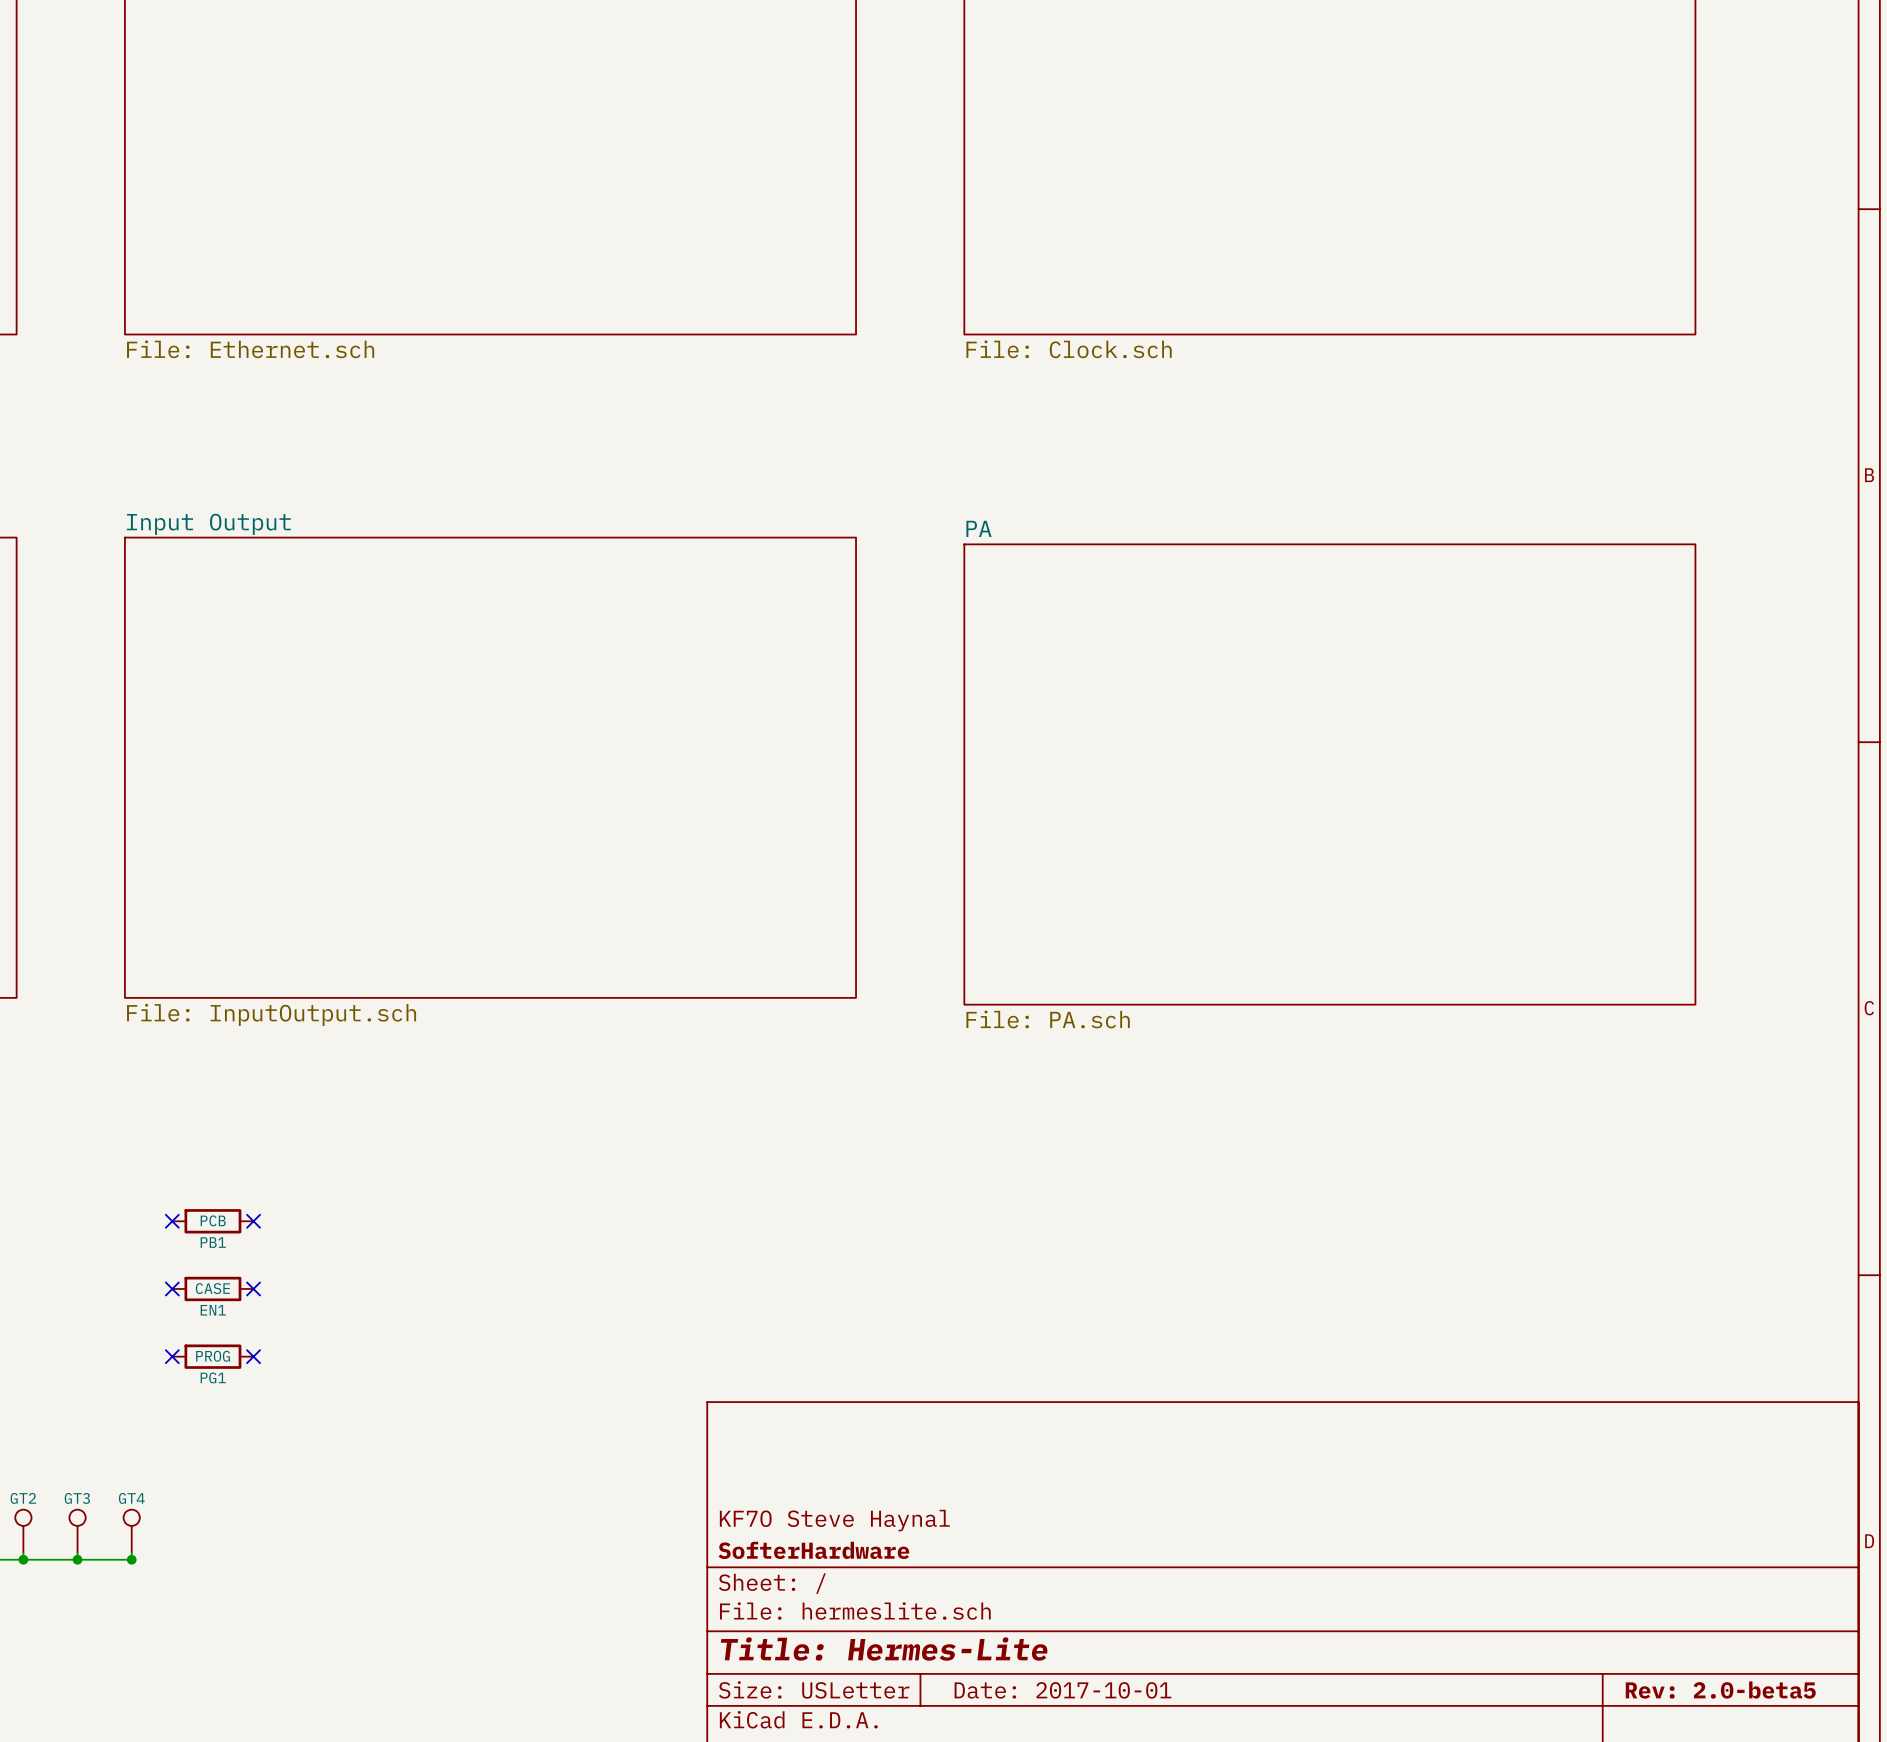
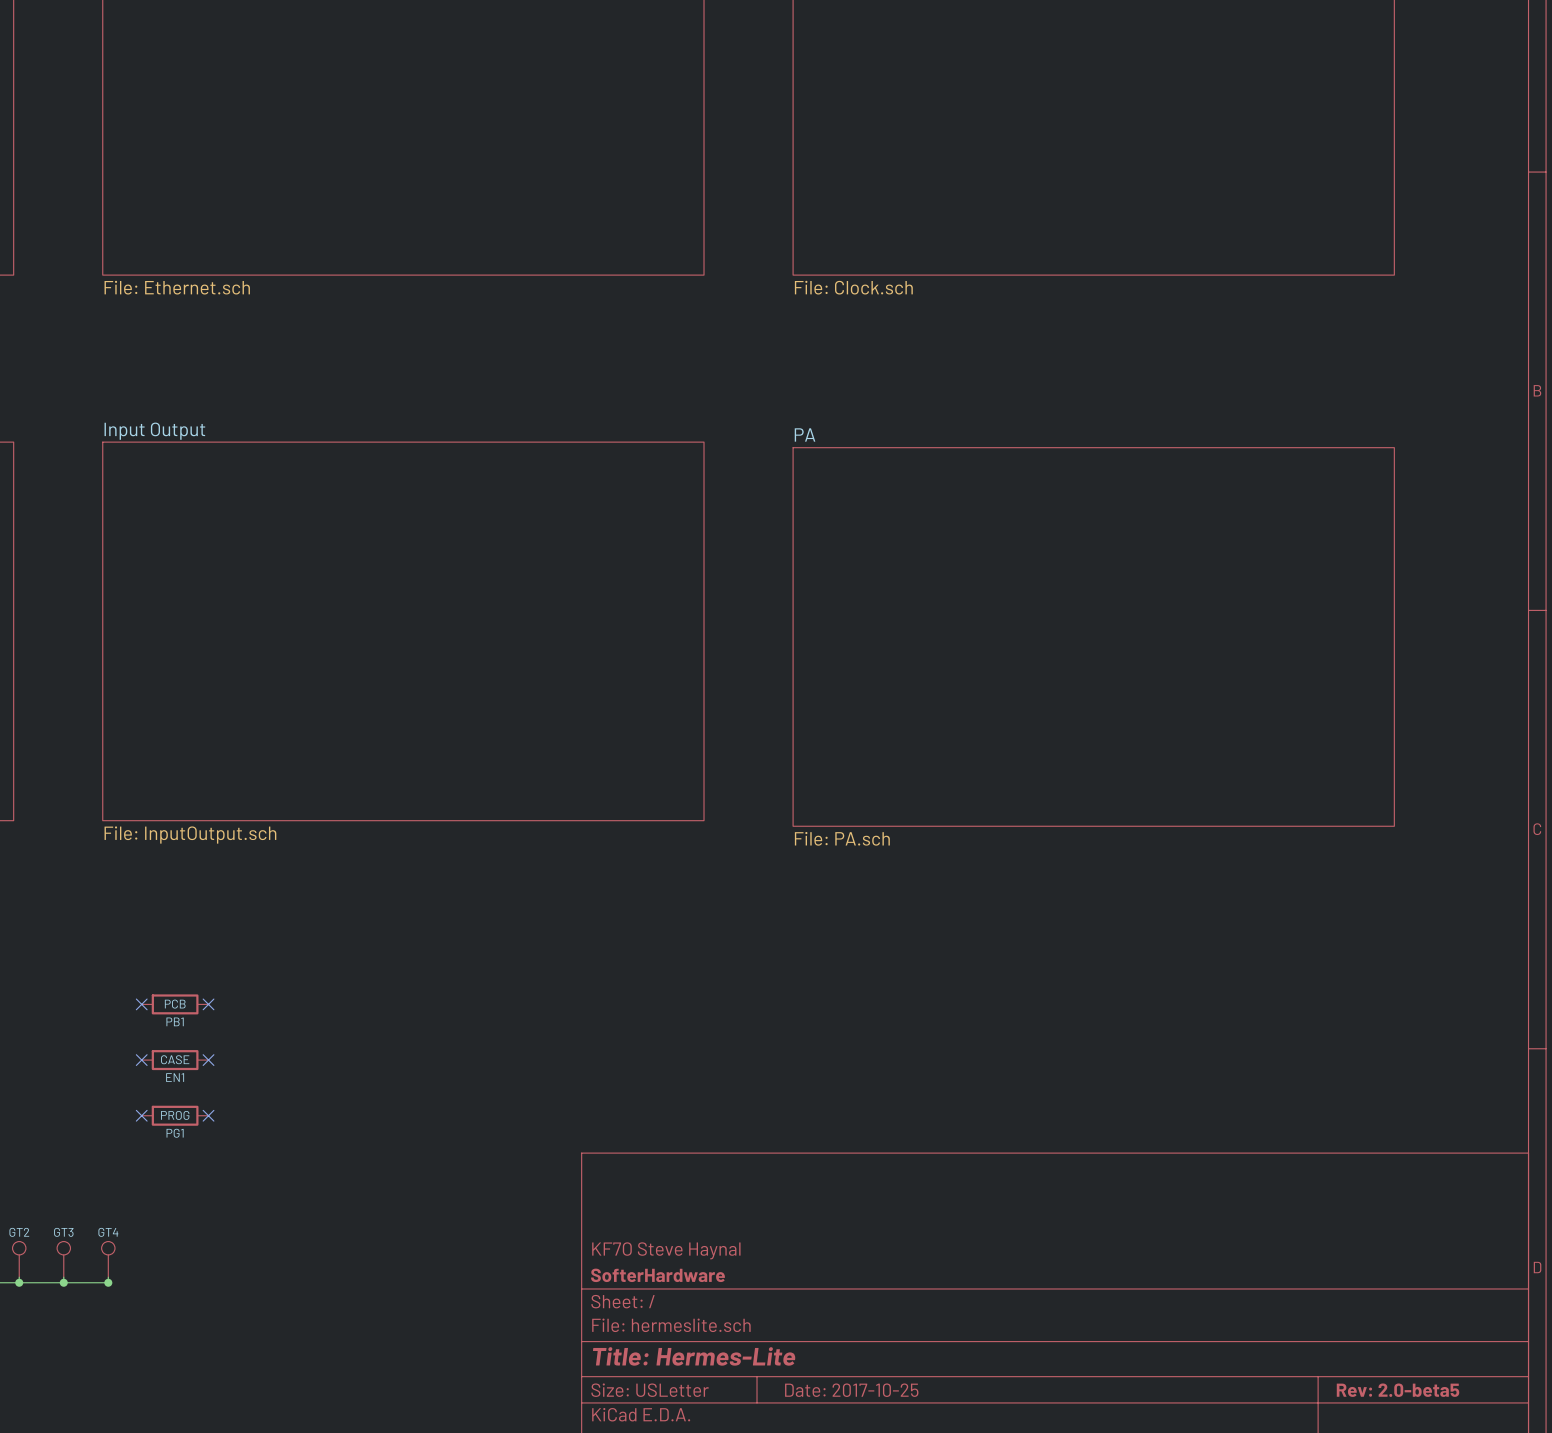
title block: Date: 2017-10-01 (1062, 1690) -> Date: 2017-10-25 (851, 1390)

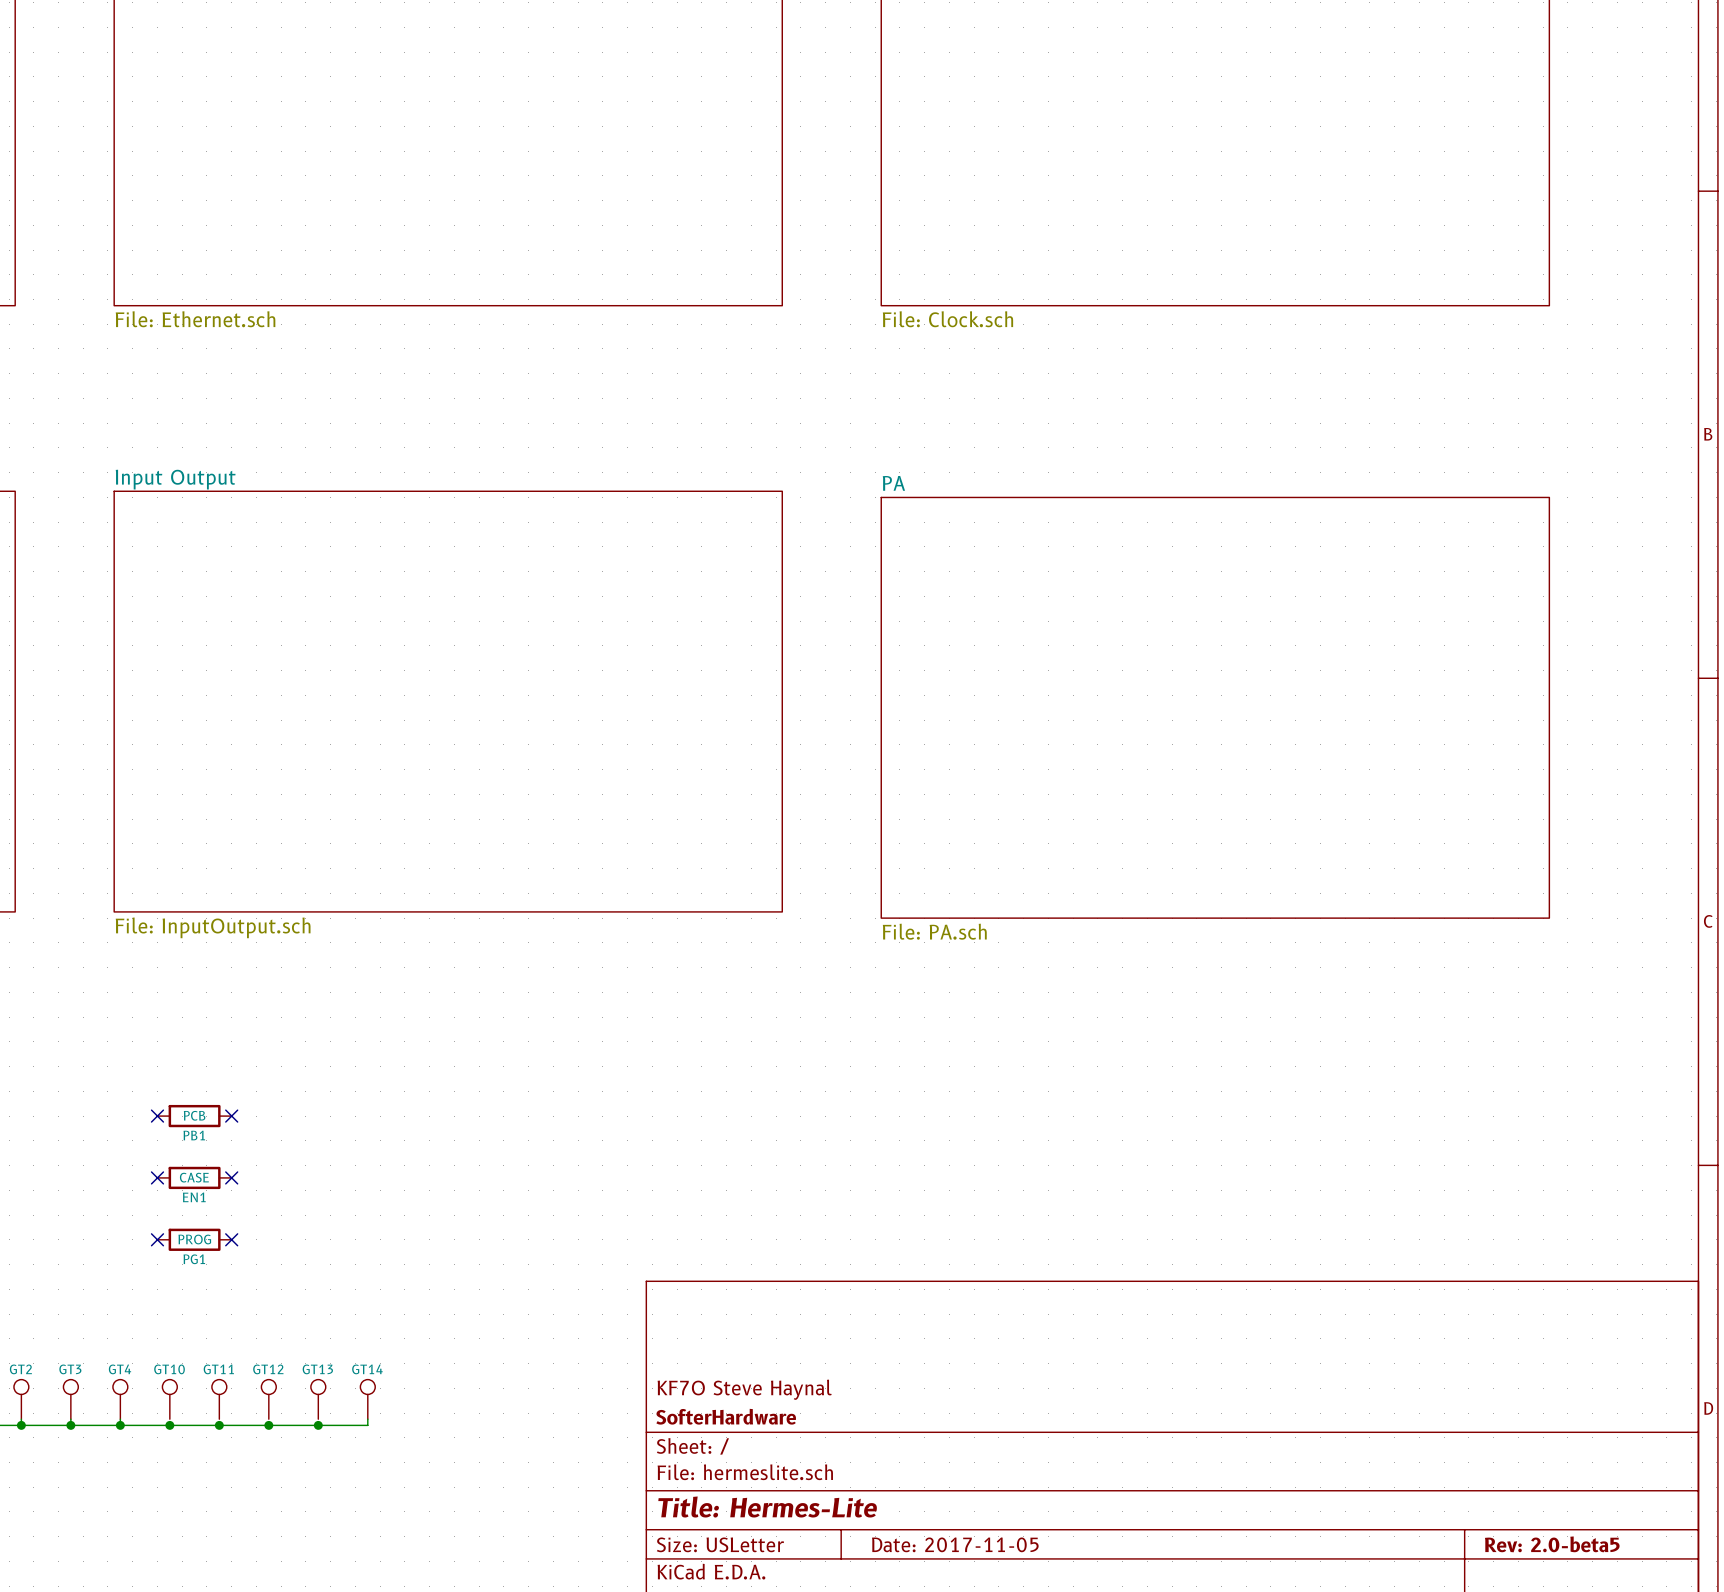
GT10: none -> (169, 1399)
GT11: none -> (219, 1399)
GT12: none -> (268, 1399)
GT13: none -> (318, 1399)
GT14: none -> (367, 1399)
wire: none -> (367, 1419) (367, 1425) (120, 1425)
junction: none -> (169, 1425)
junction: none -> (219, 1425)
junction: none -> (268, 1425)
junction: none -> (318, 1425)
title block: Date: 2017-10-25 (851, 1390) -> Date: 2017-11-05 (955, 1544)

